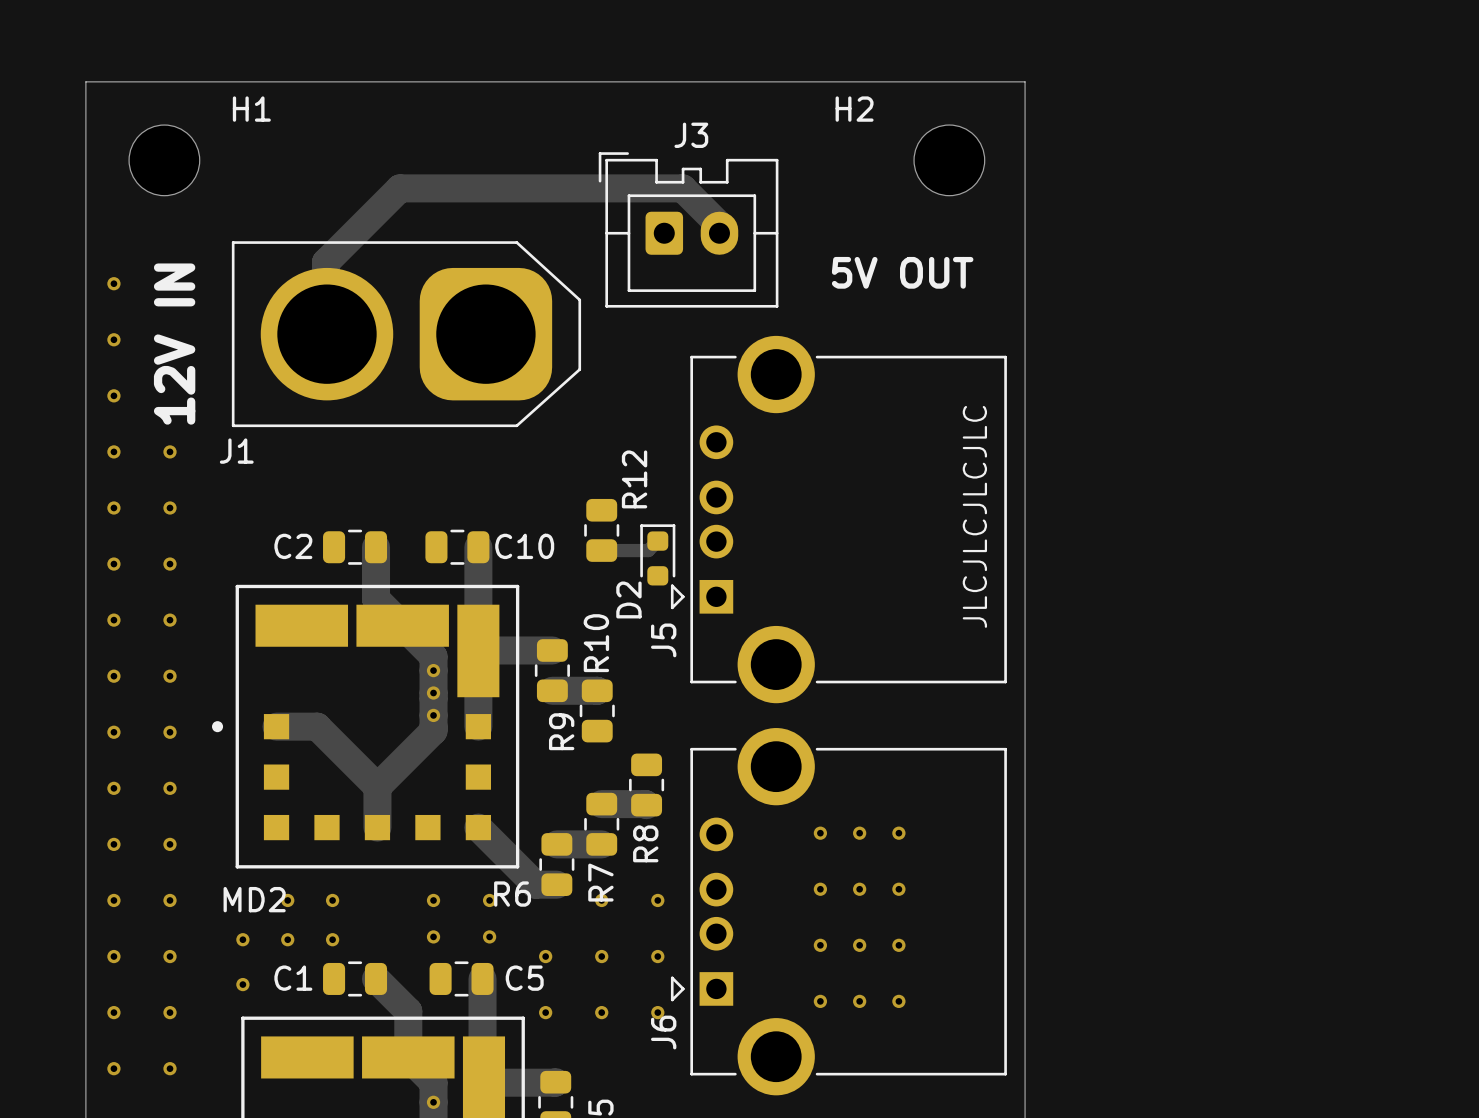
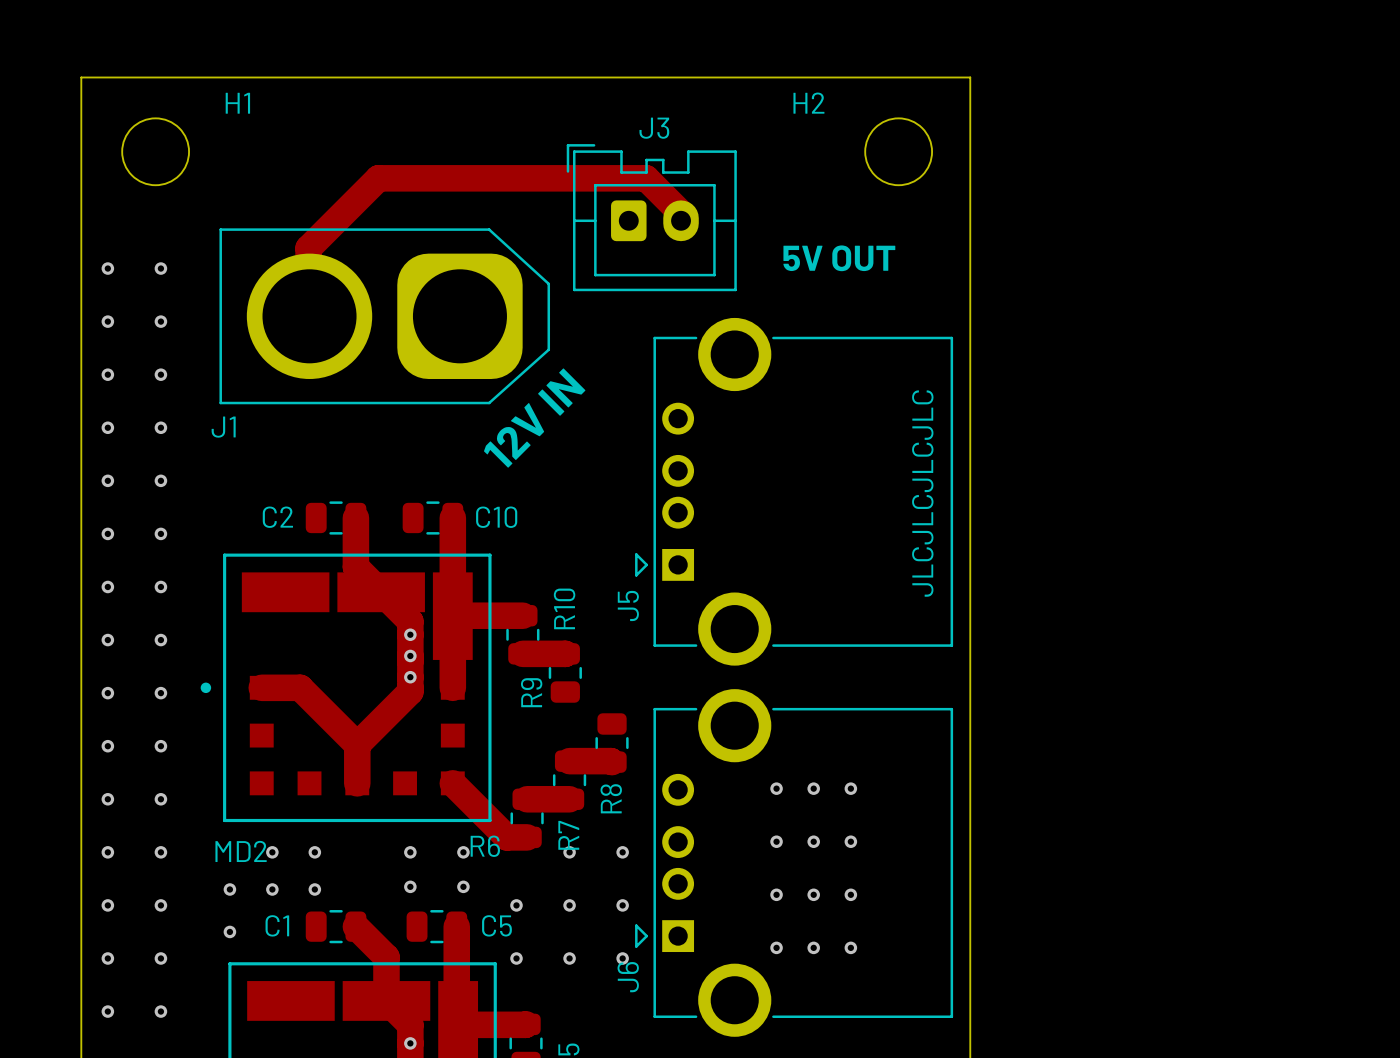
via: none -> (160, 268)
via: none -> (160, 321)
text rotation: 0° (174, 344) -> 45° clockwise (534, 418)
text position: 12V IN (174, 344) -> 12V IN (534, 418)
via: none -> (160, 374)
R12: (601, 530) -> none
track: (657, 541) (648, 550) (601, 550) -> none
D2: (657, 554) -> none

